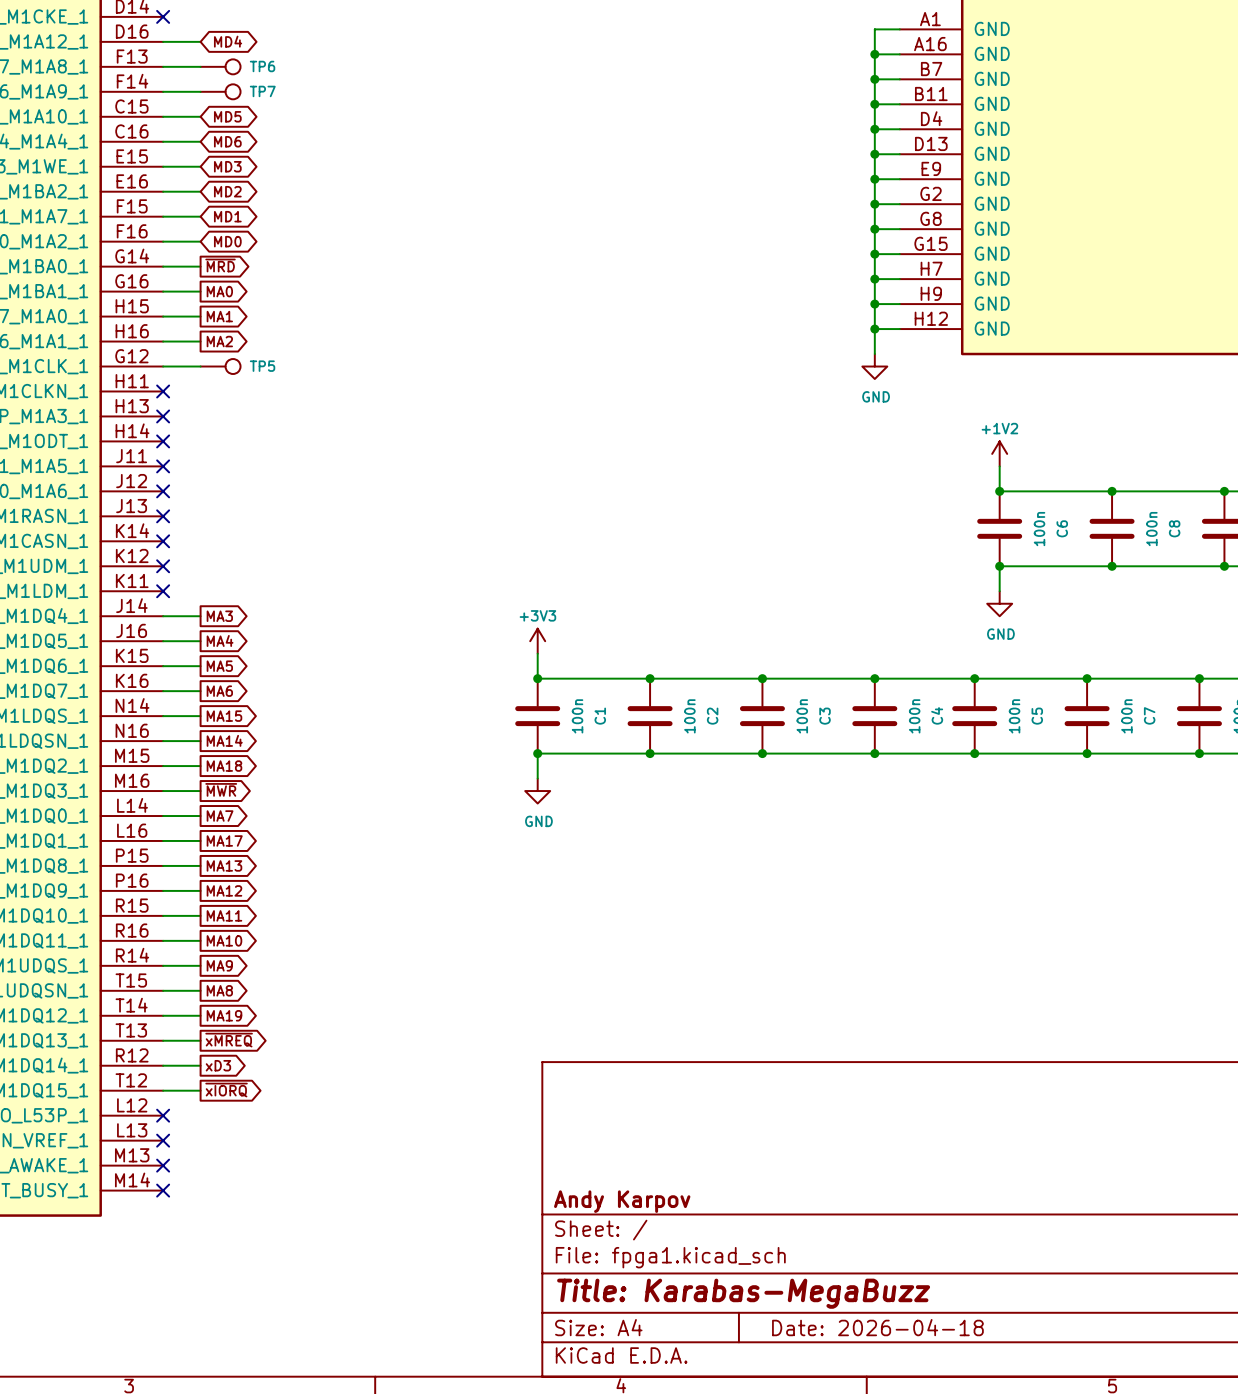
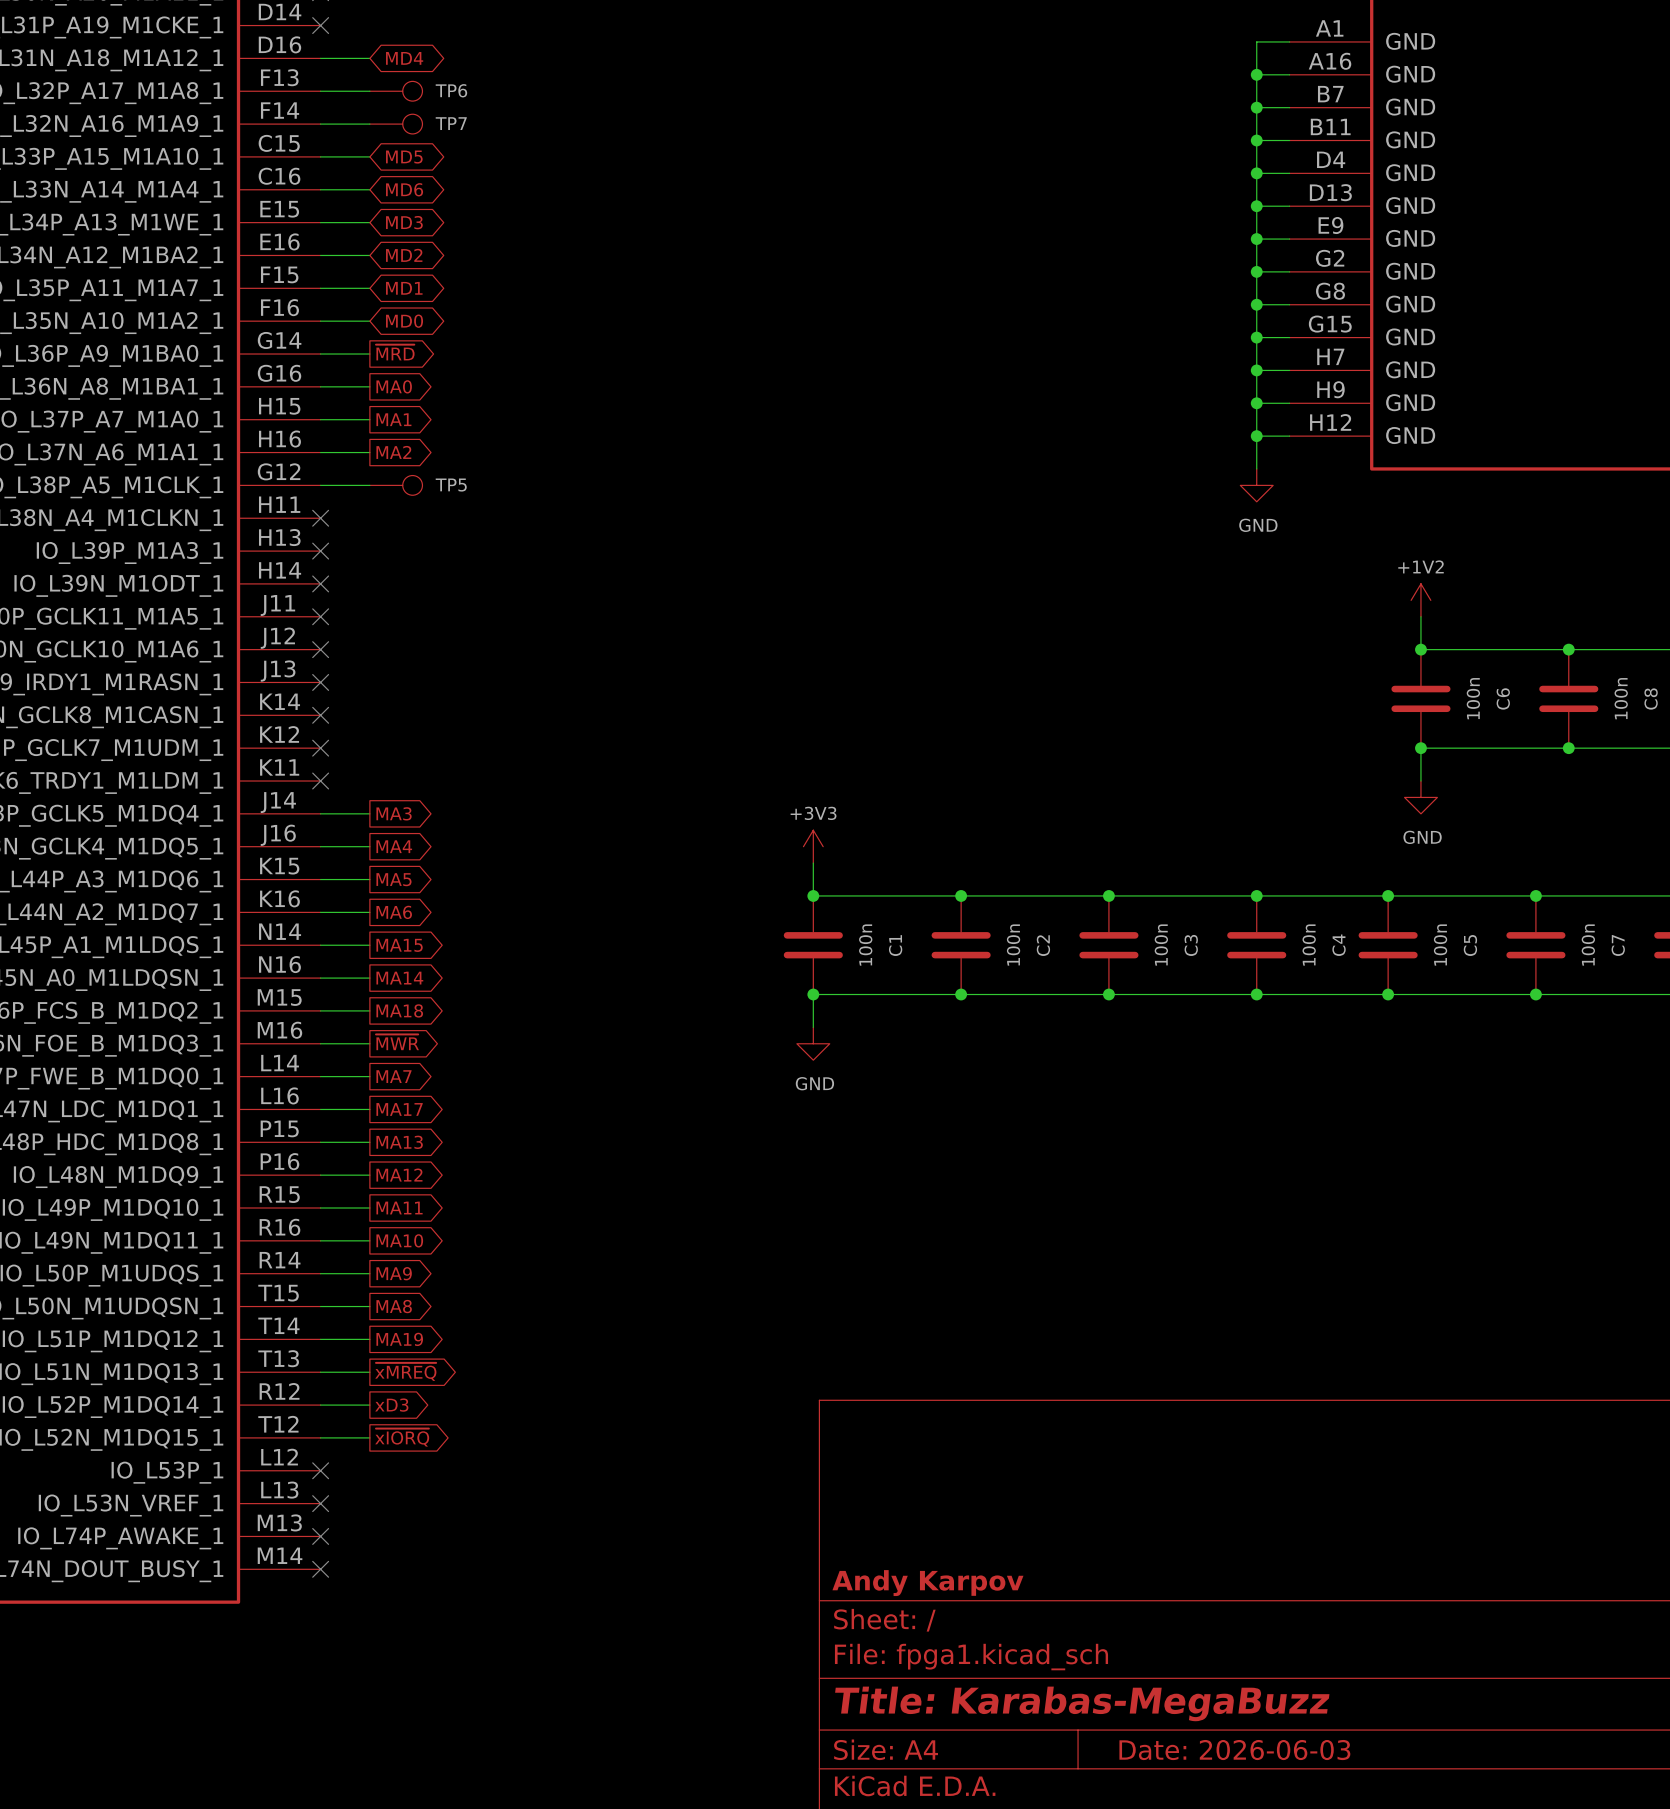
title block: Date: 2026-04-18 (877, 1327) -> Date: 2026-06-03 (1234, 1750)

